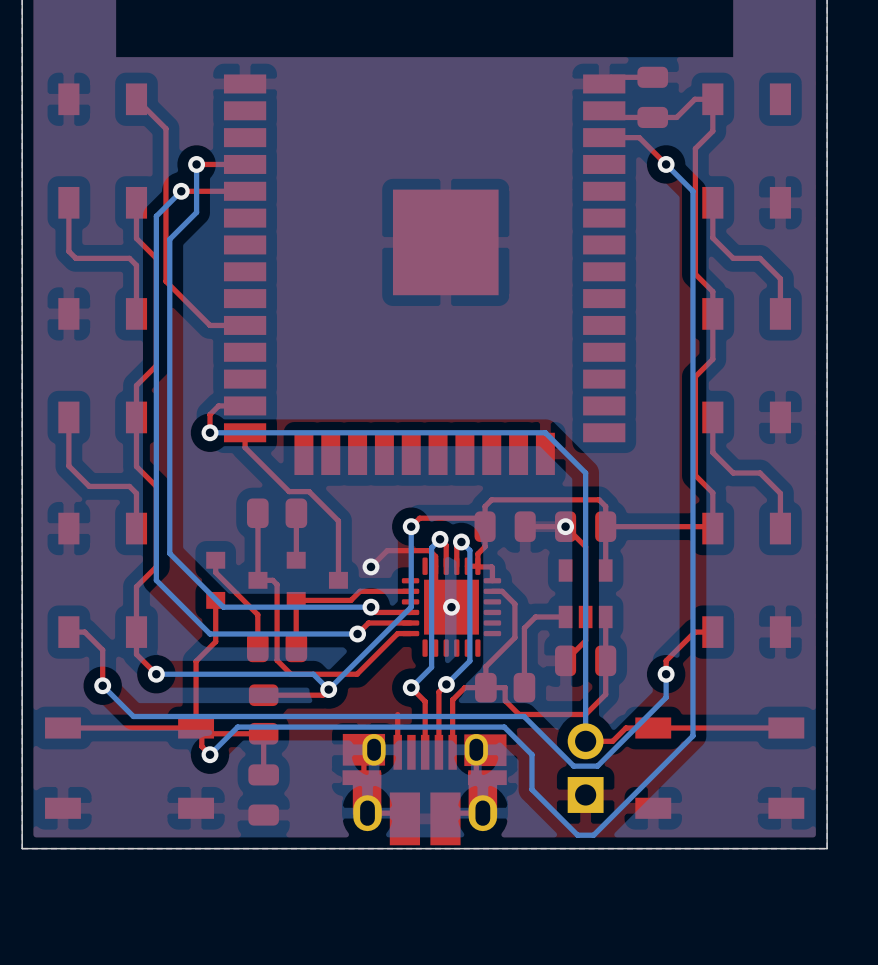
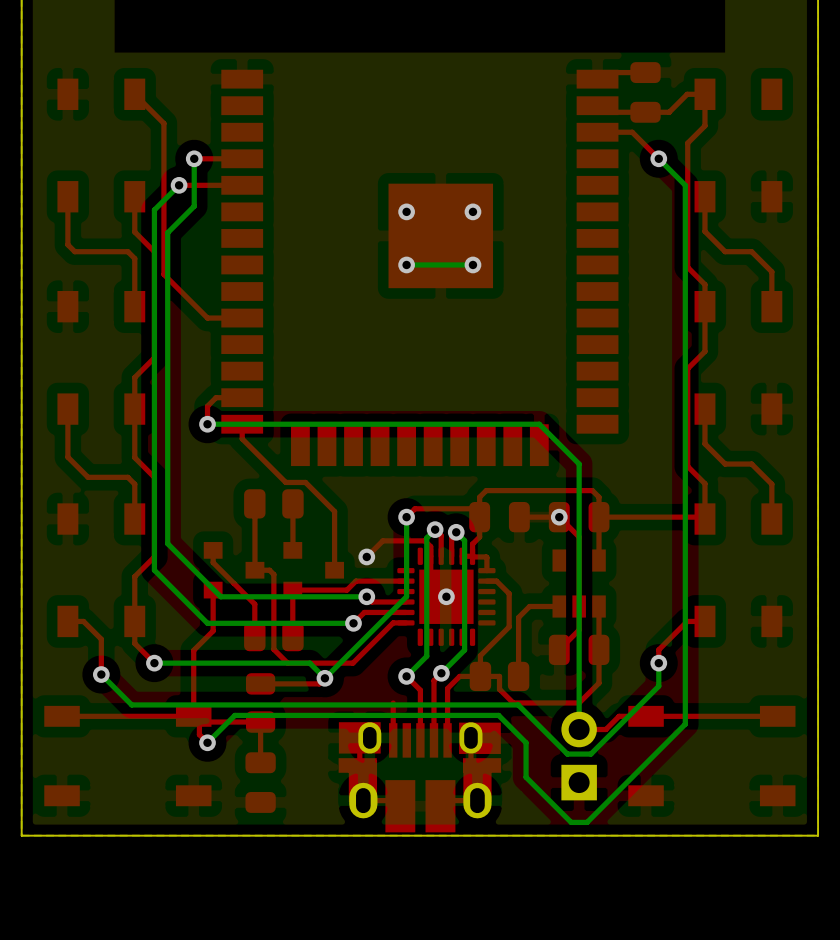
via: none -> (406, 211)
via: none -> (472, 211)
via: none -> (406, 264)
bottom track: none -> (472, 264) (406, 264)
via: none -> (472, 264)

